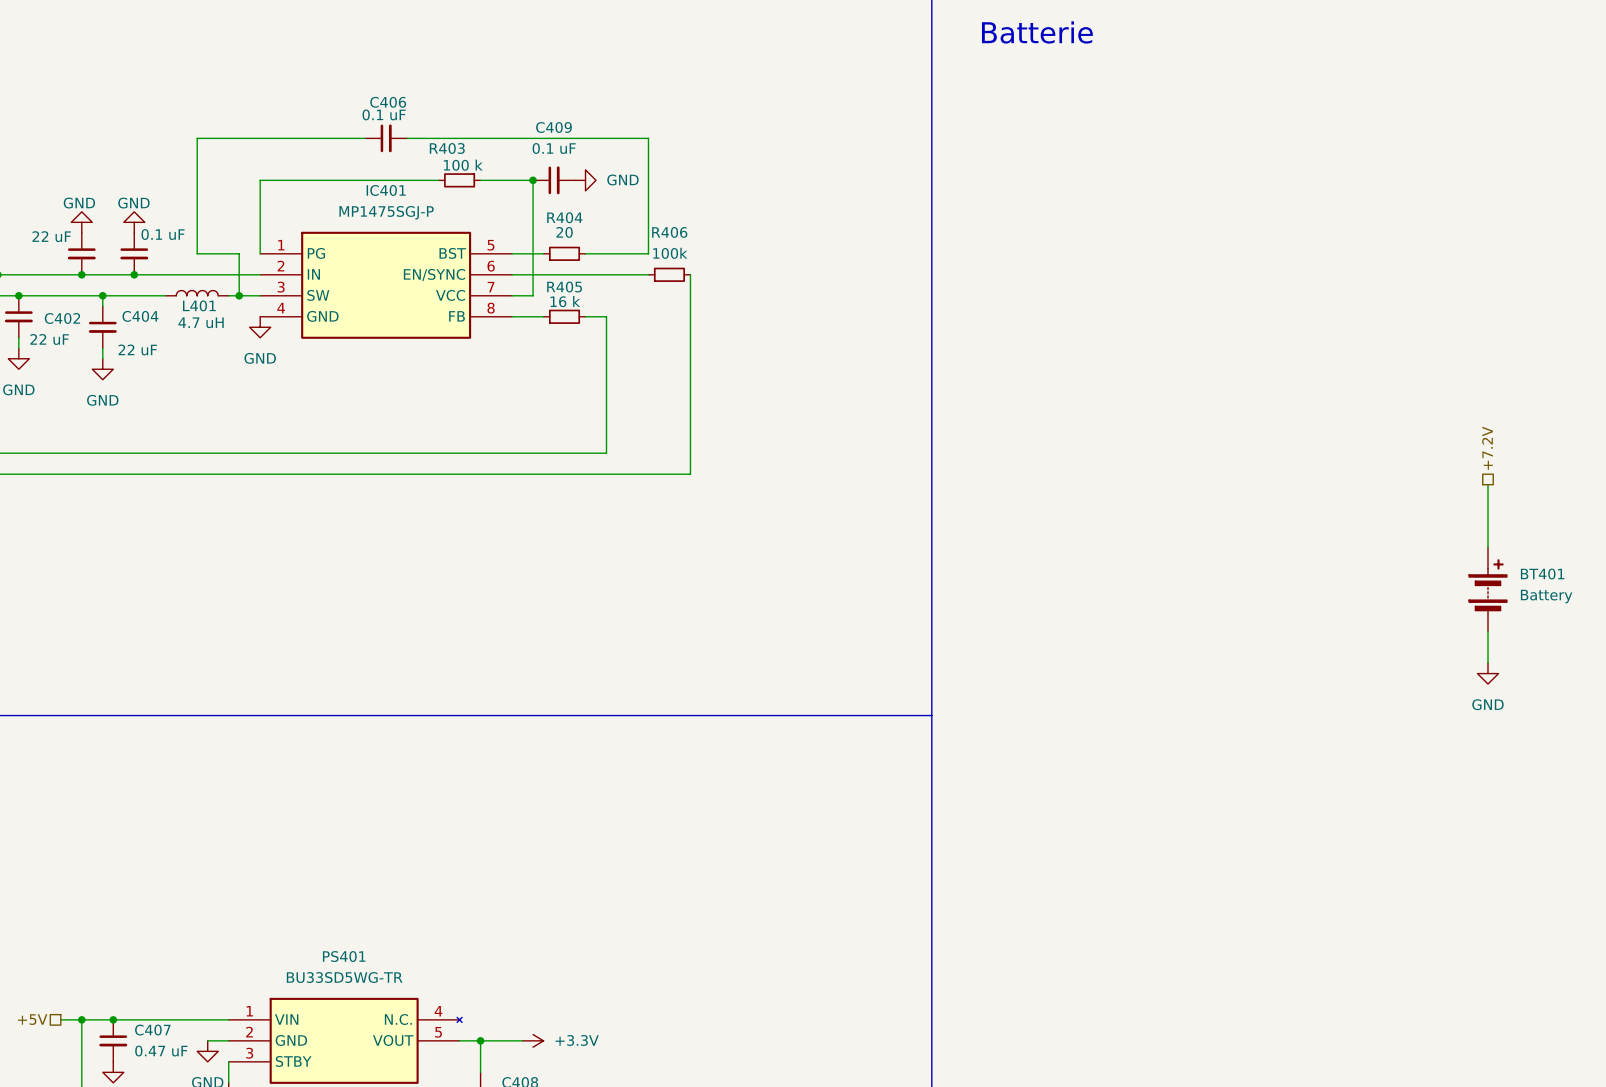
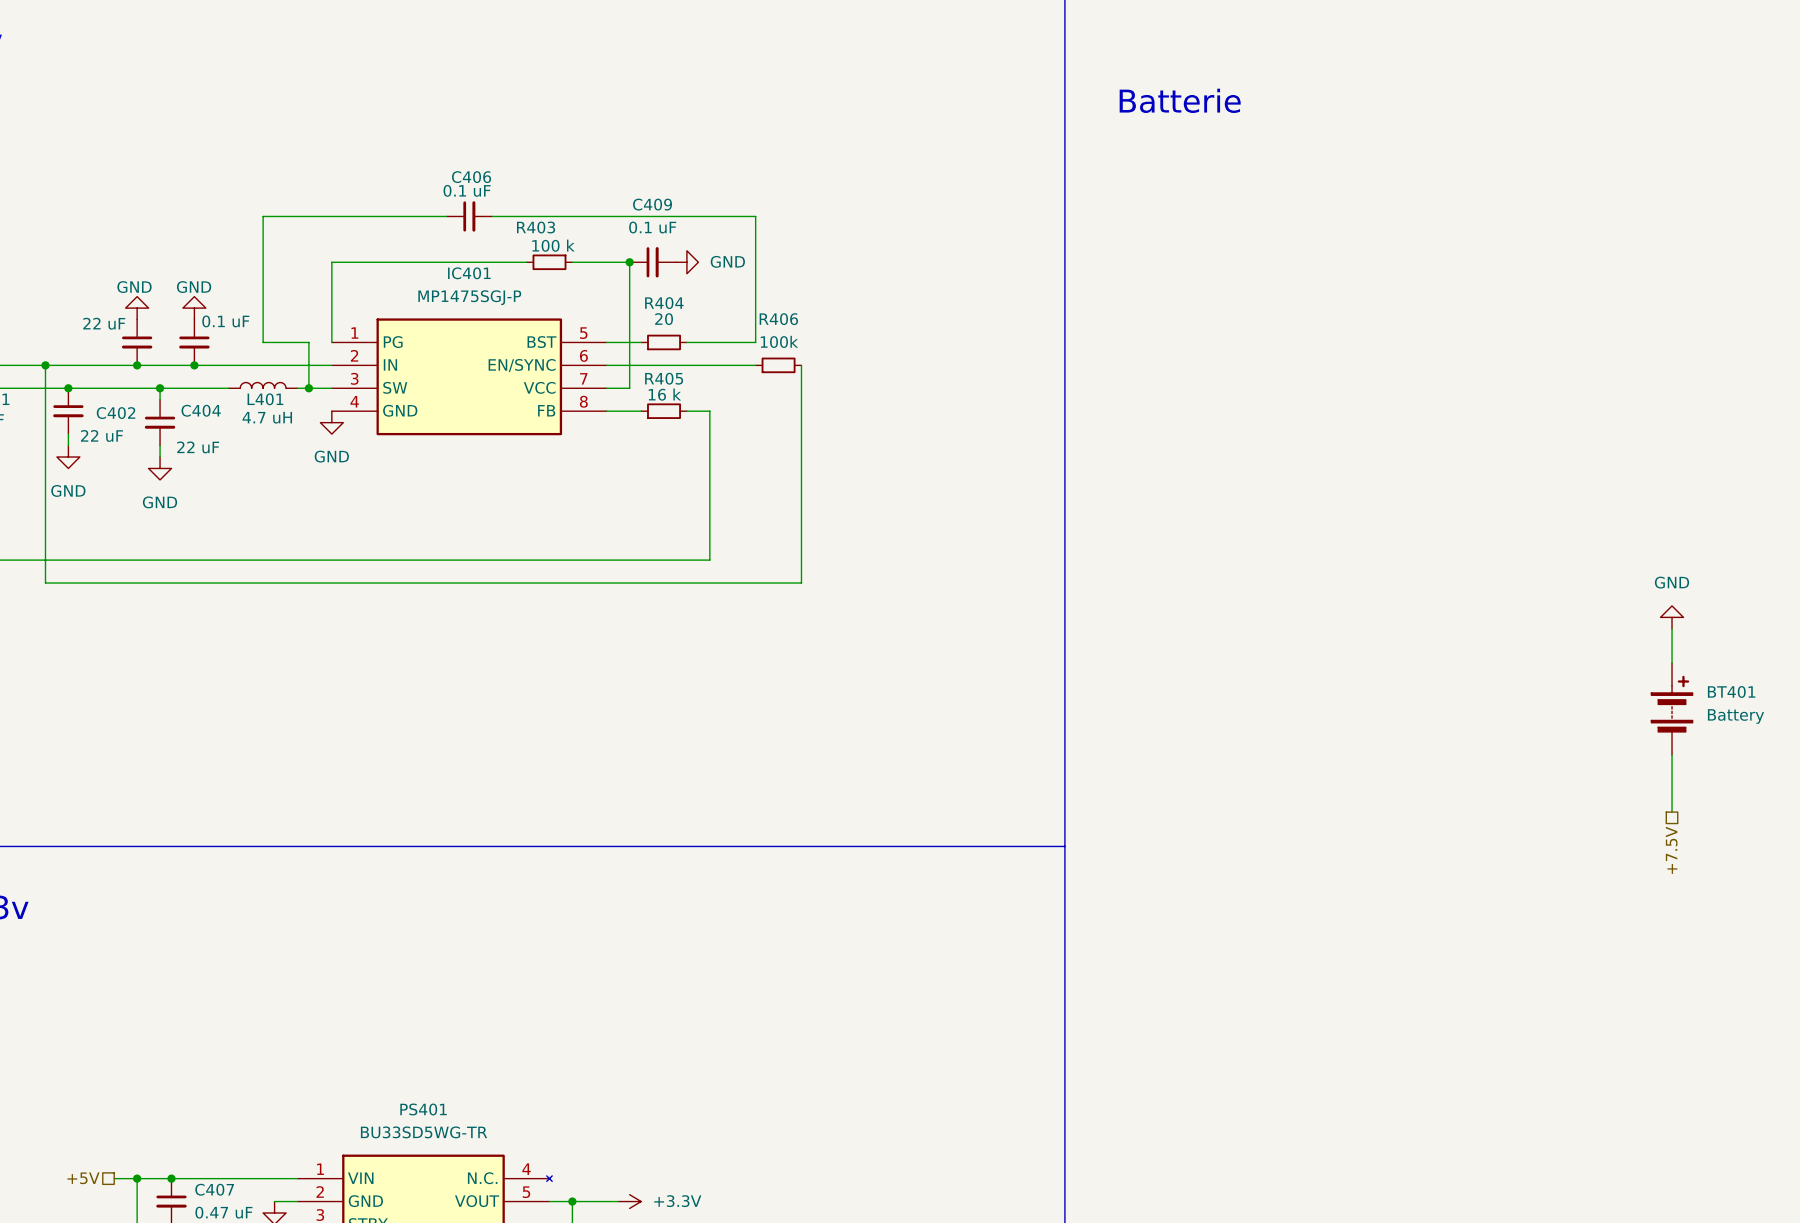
hierarchical label: +7.2V (1487, 448) -> none
wire: (1488, 484) (1488, 516) -> none
power symbol rotation: 0° (1488, 673) -> 180° (1672, 617)
power symbol position: GND (1488, 673) -> GND (1672, 617)
hierarchical label: none -> +7.5V (1671, 850)

